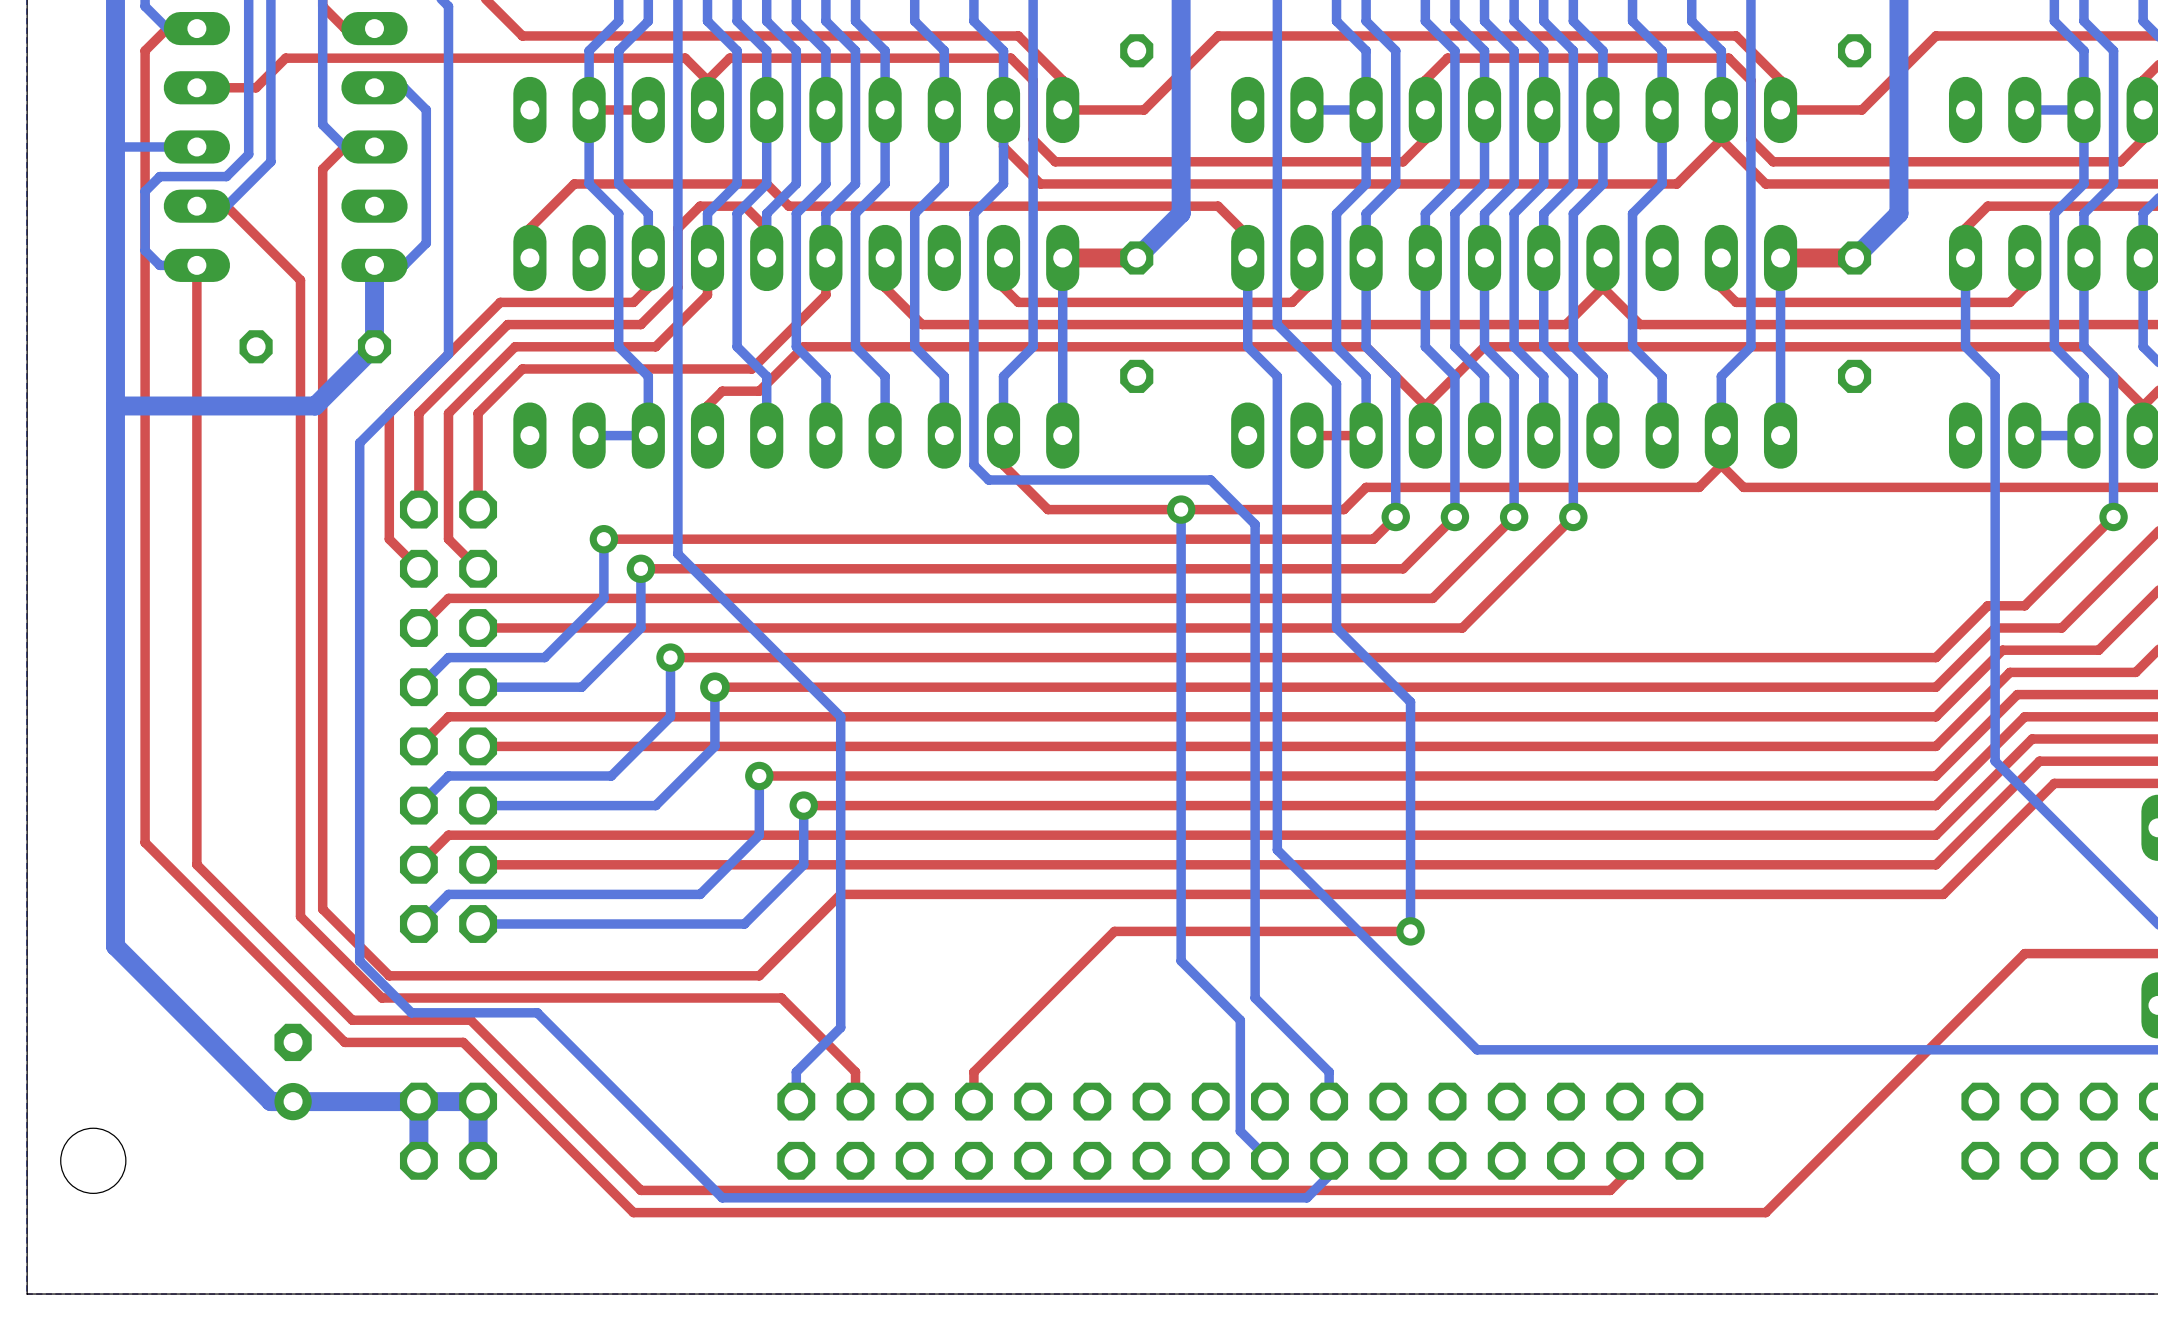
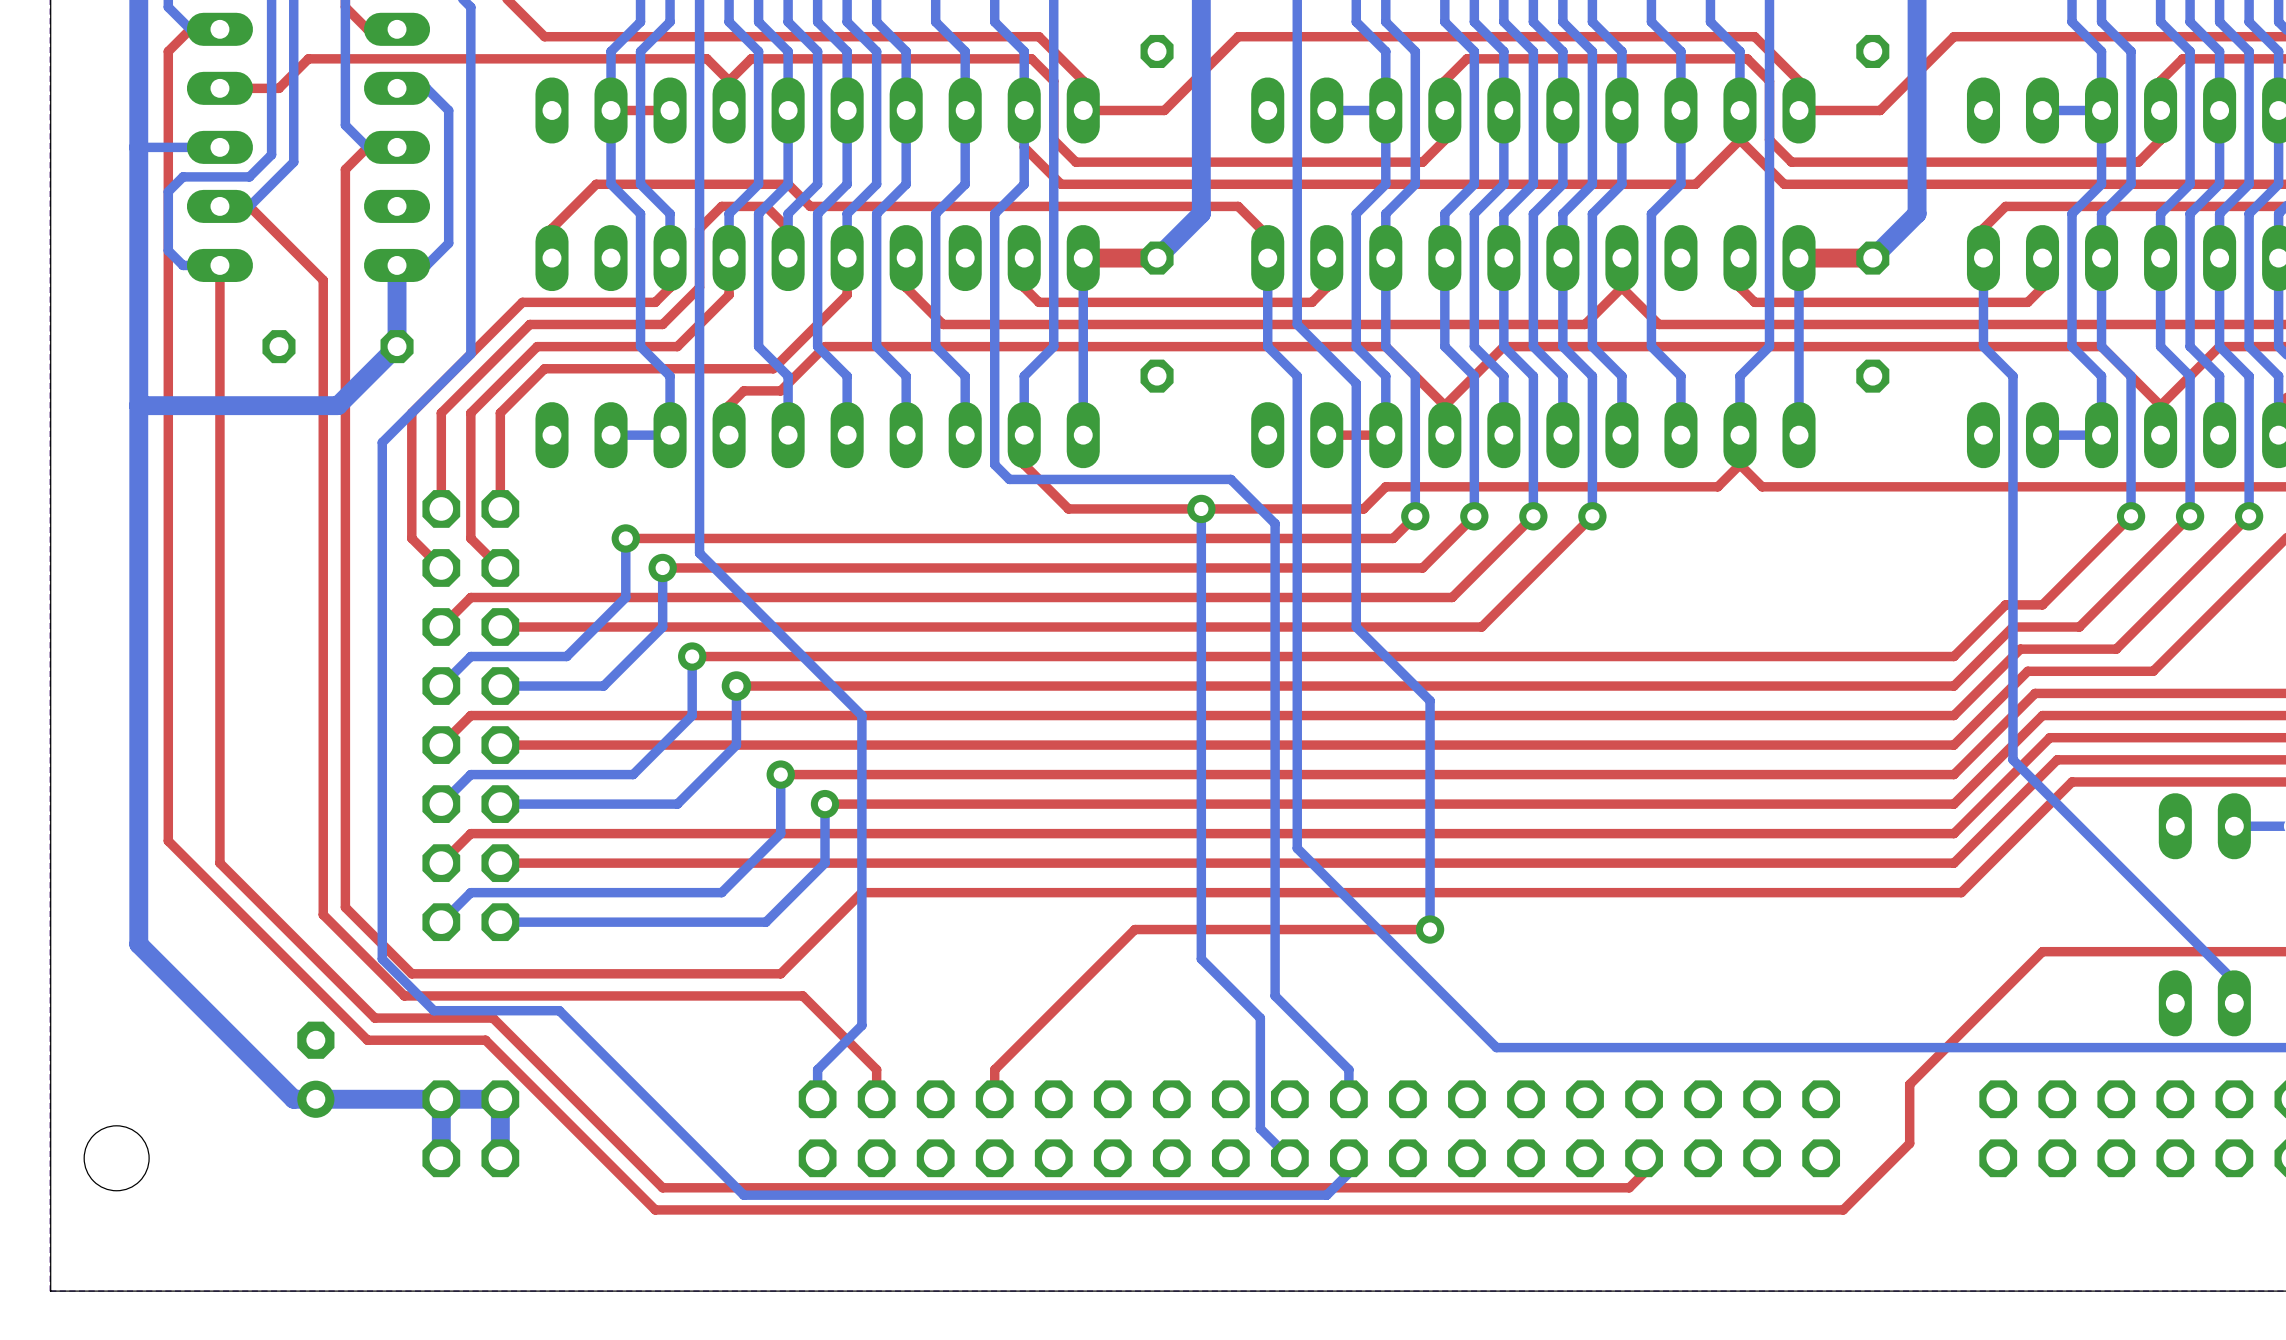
top track: (1891, 1086) (1765, 1212) -> (1909, 1084) (1909, 1143) (1843, 1209) (1784, 1209)
part: none -> (1319, 1128)

